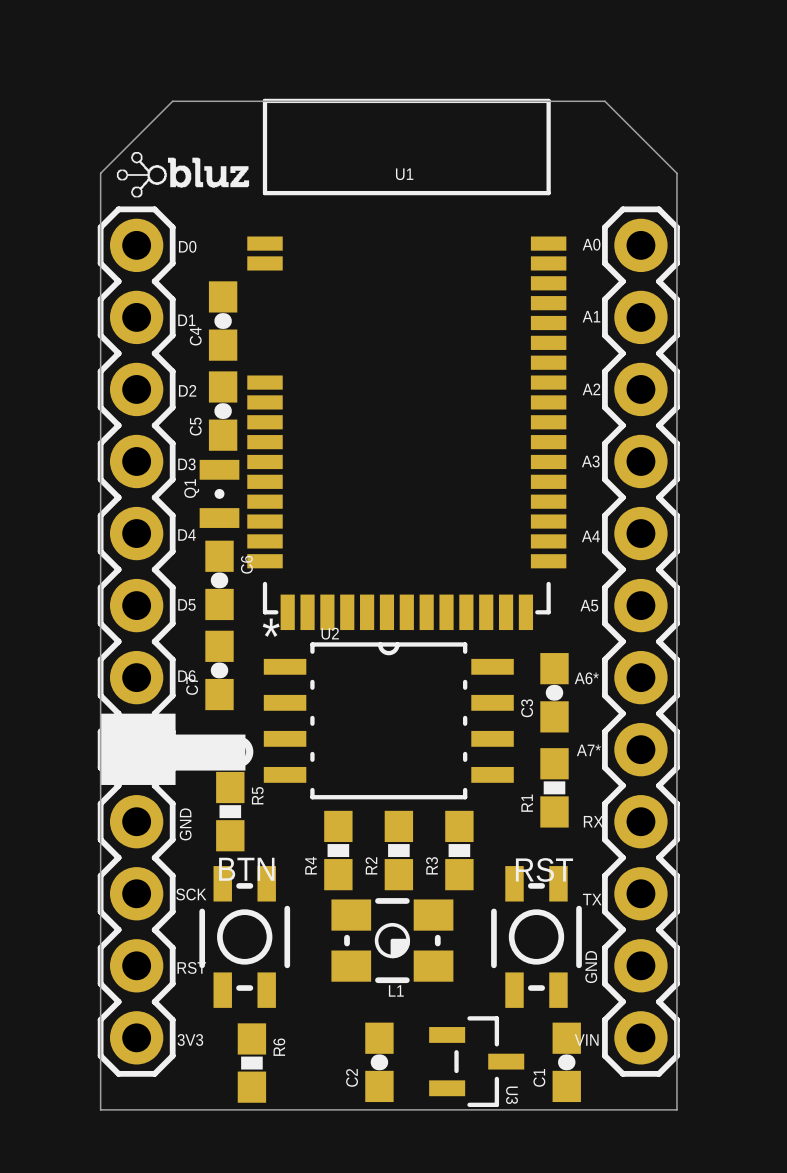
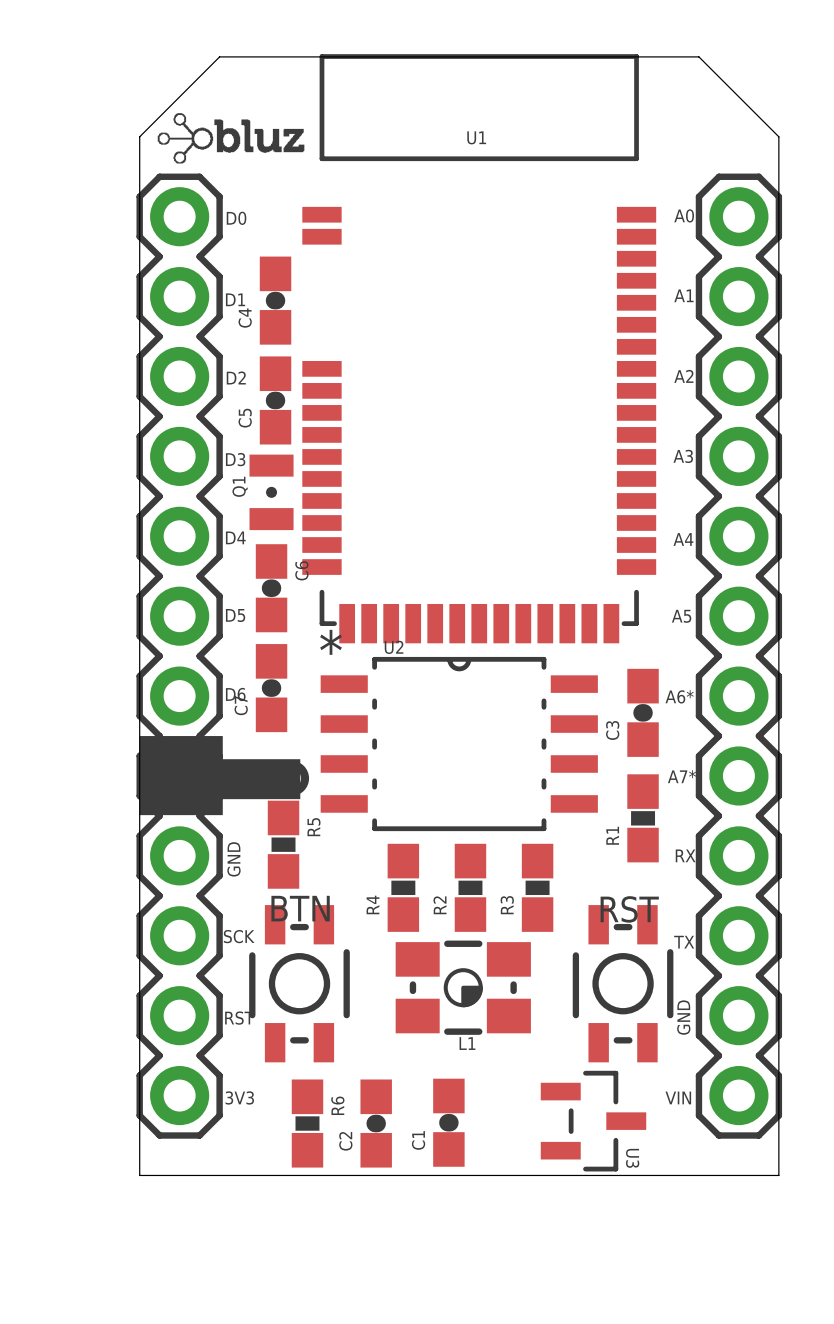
U3 position: (476, 1061) -> (593, 1121)
C1: (566, 1062) -> none
C2: none -> (376, 1123)
C2 name: C2 (352, 1077) -> C1 (418, 1140)

